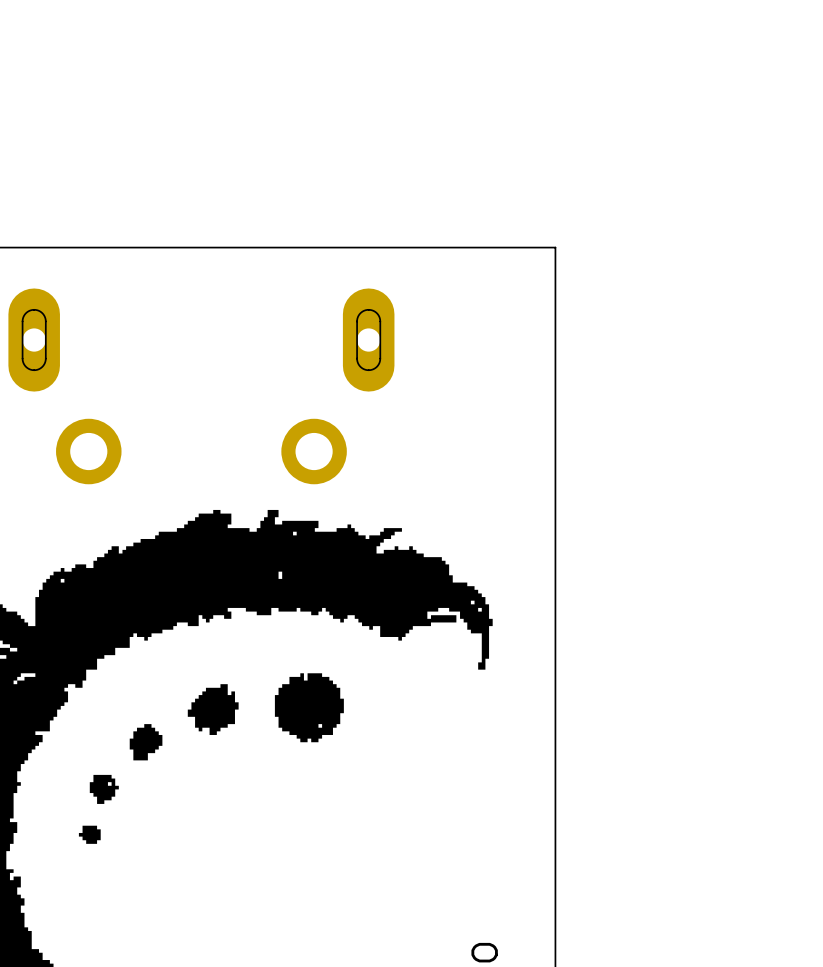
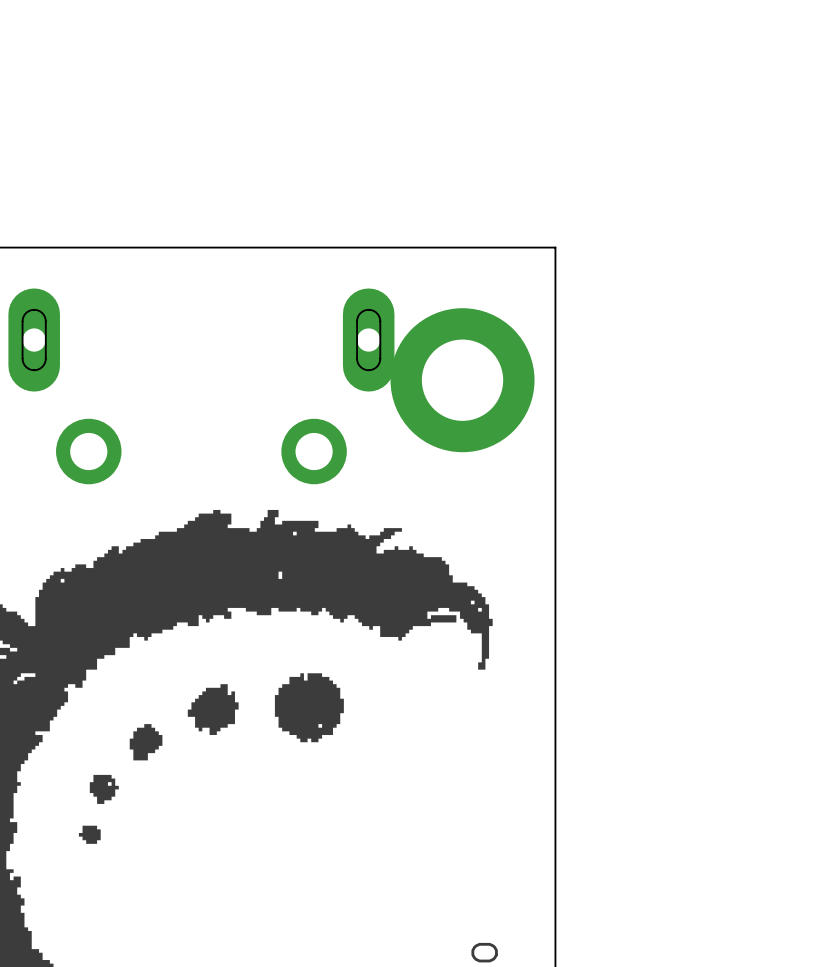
part: none -> (462, 380)

